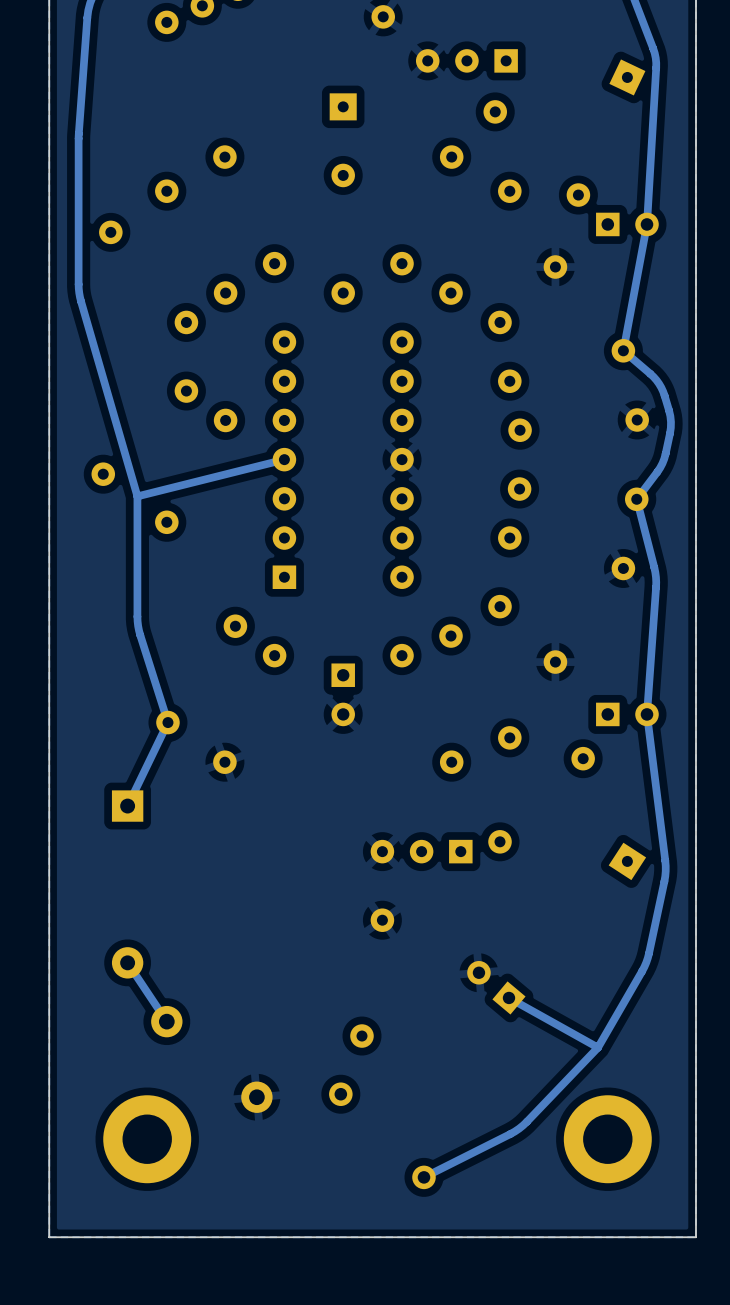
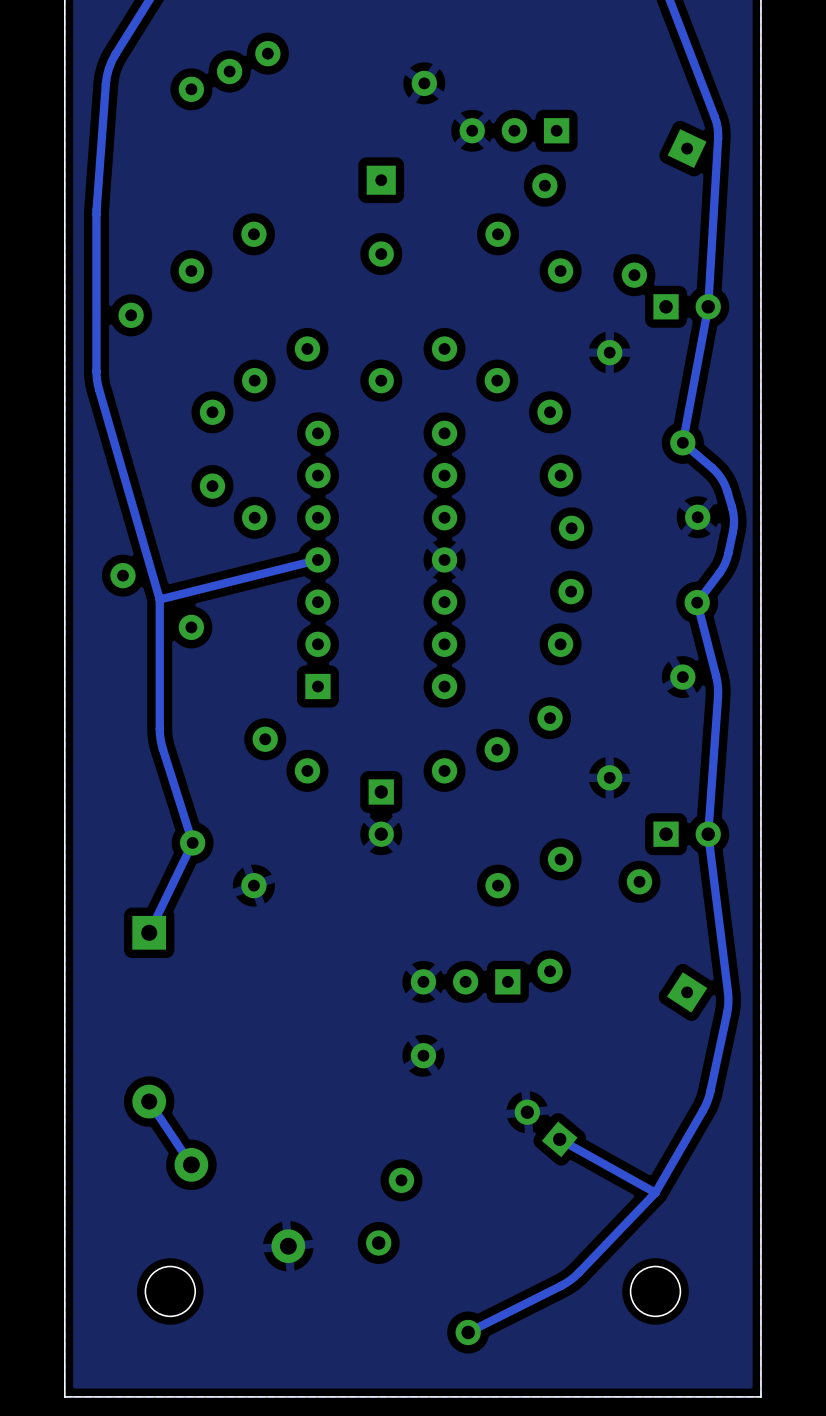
round board edge: none -> [144, 1266, 196, 1317]
round board edge: none -> [630, 1266, 681, 1317]
part: (147, 1139) -> none
part: (607, 1139) -> none

